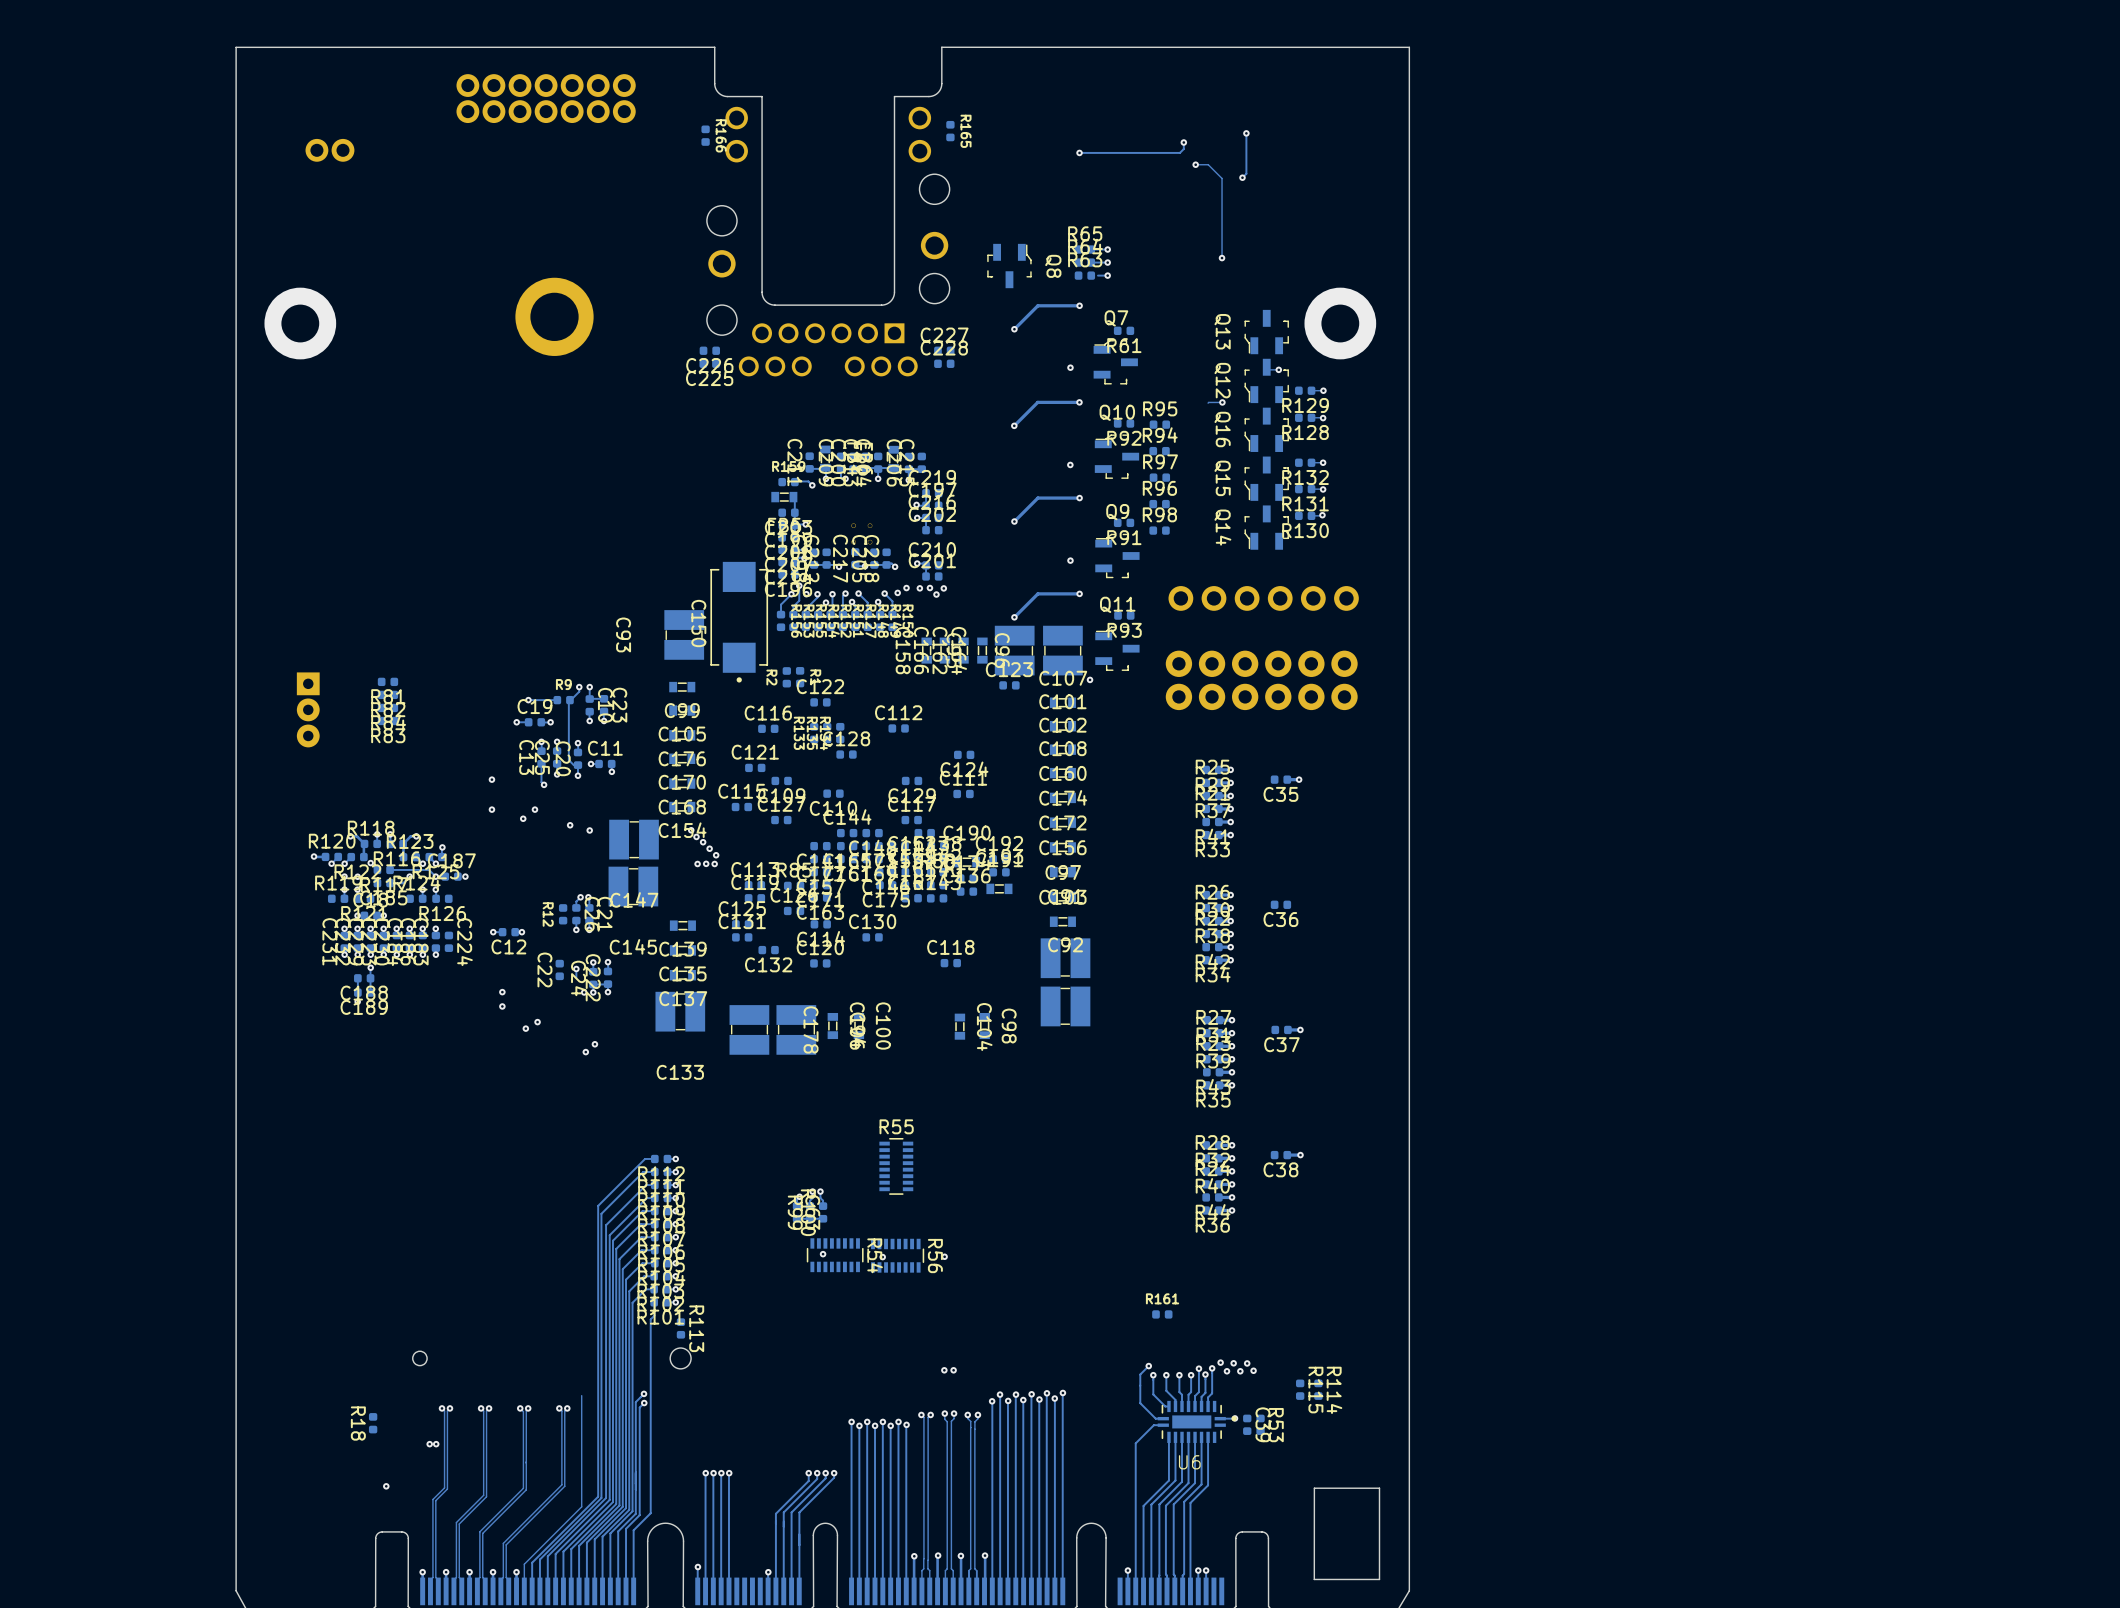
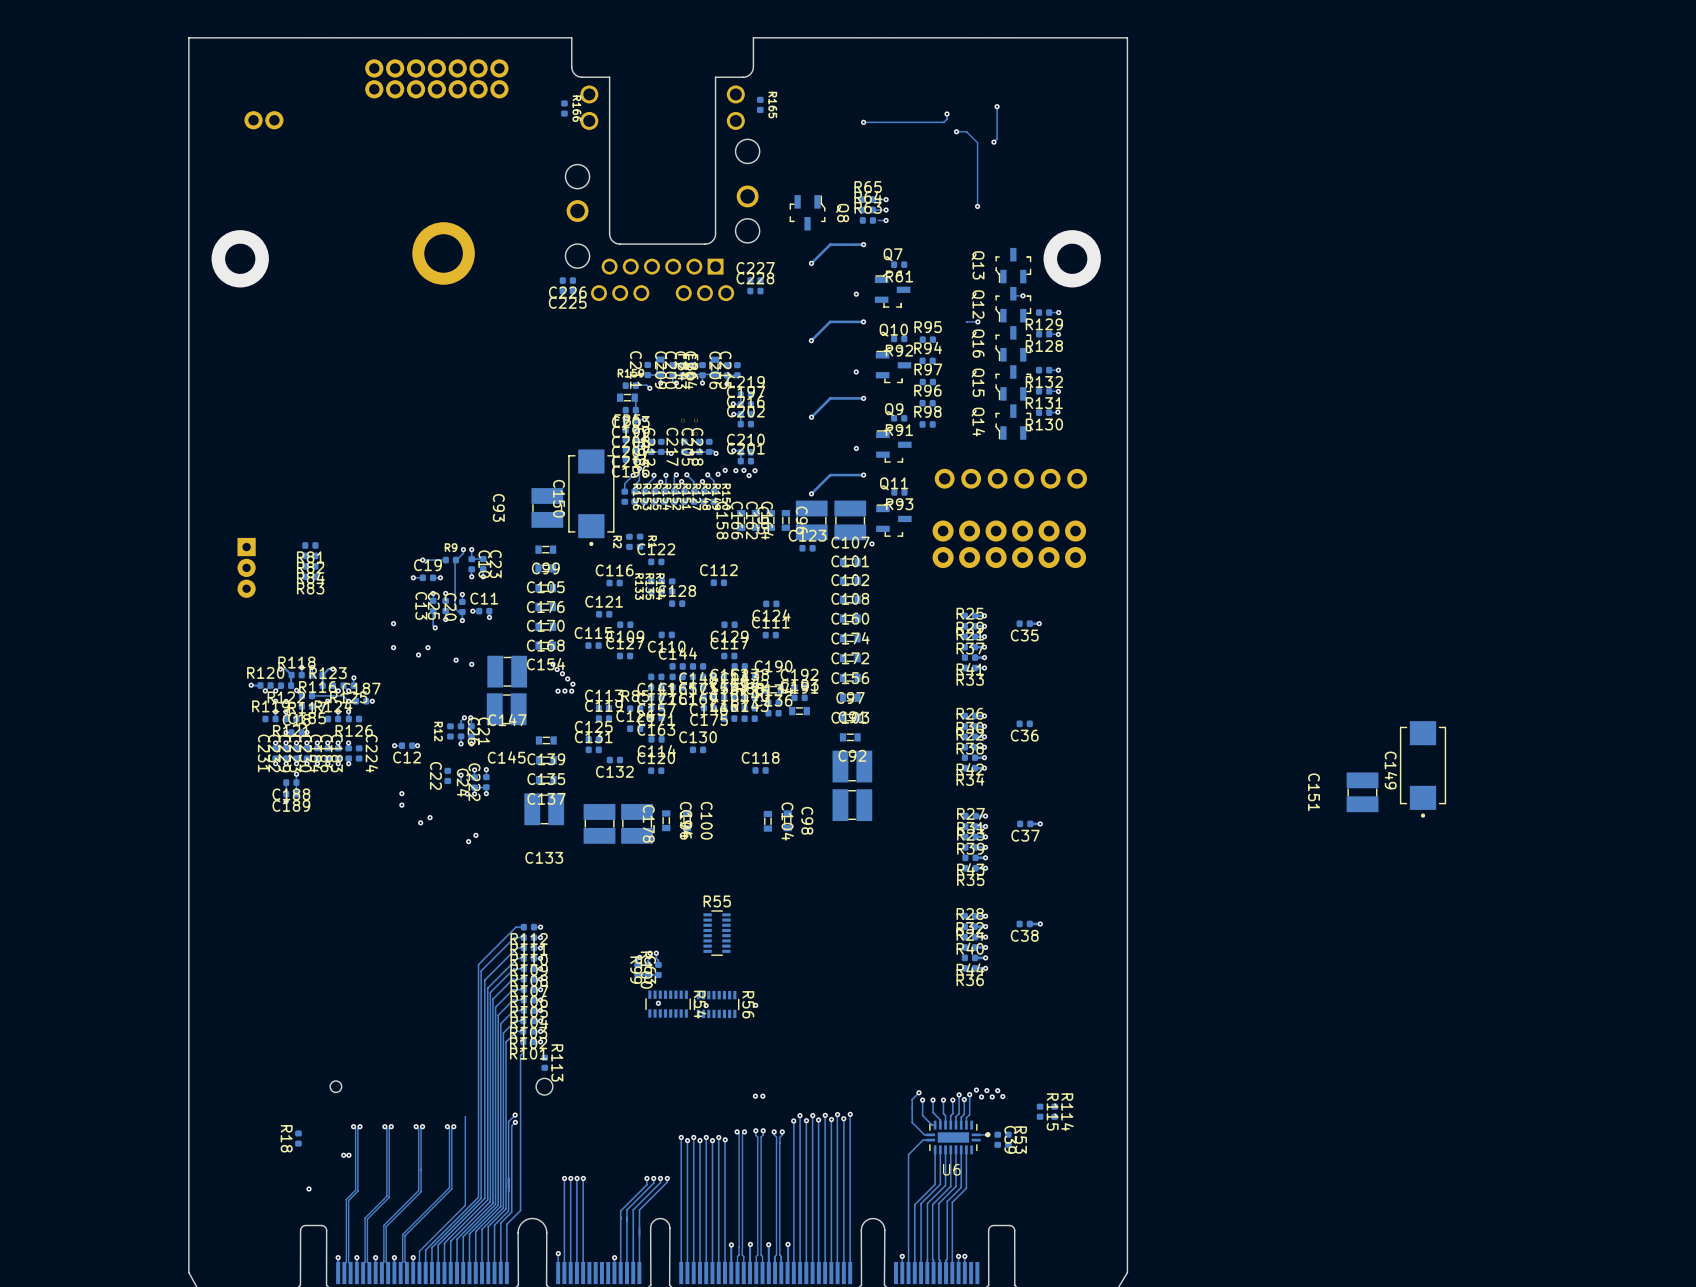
C149: none -> (1423, 769)
C151: none -> (1362, 792)
R161: (1162, 1314) -> none
board edge: (1379, 1488) (1379, 1579) (1314, 1579) (1314, 1488) (1379, 1488) -> none

